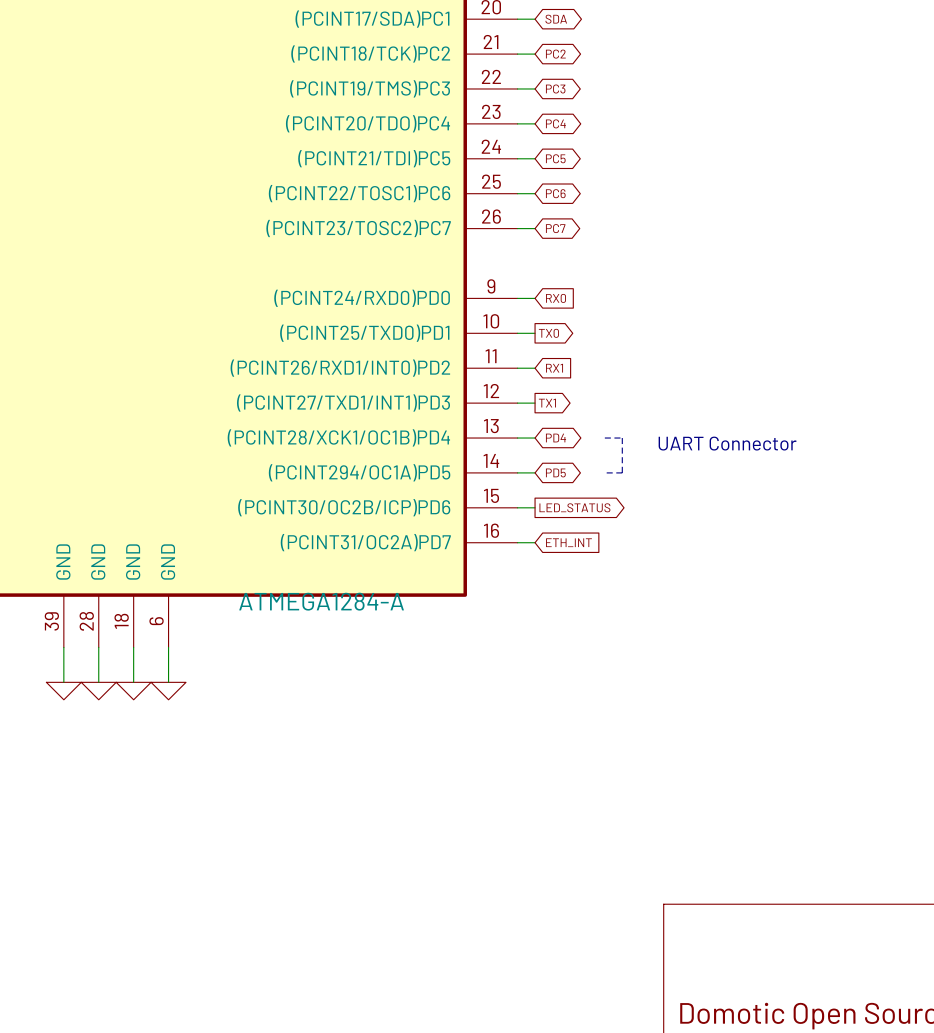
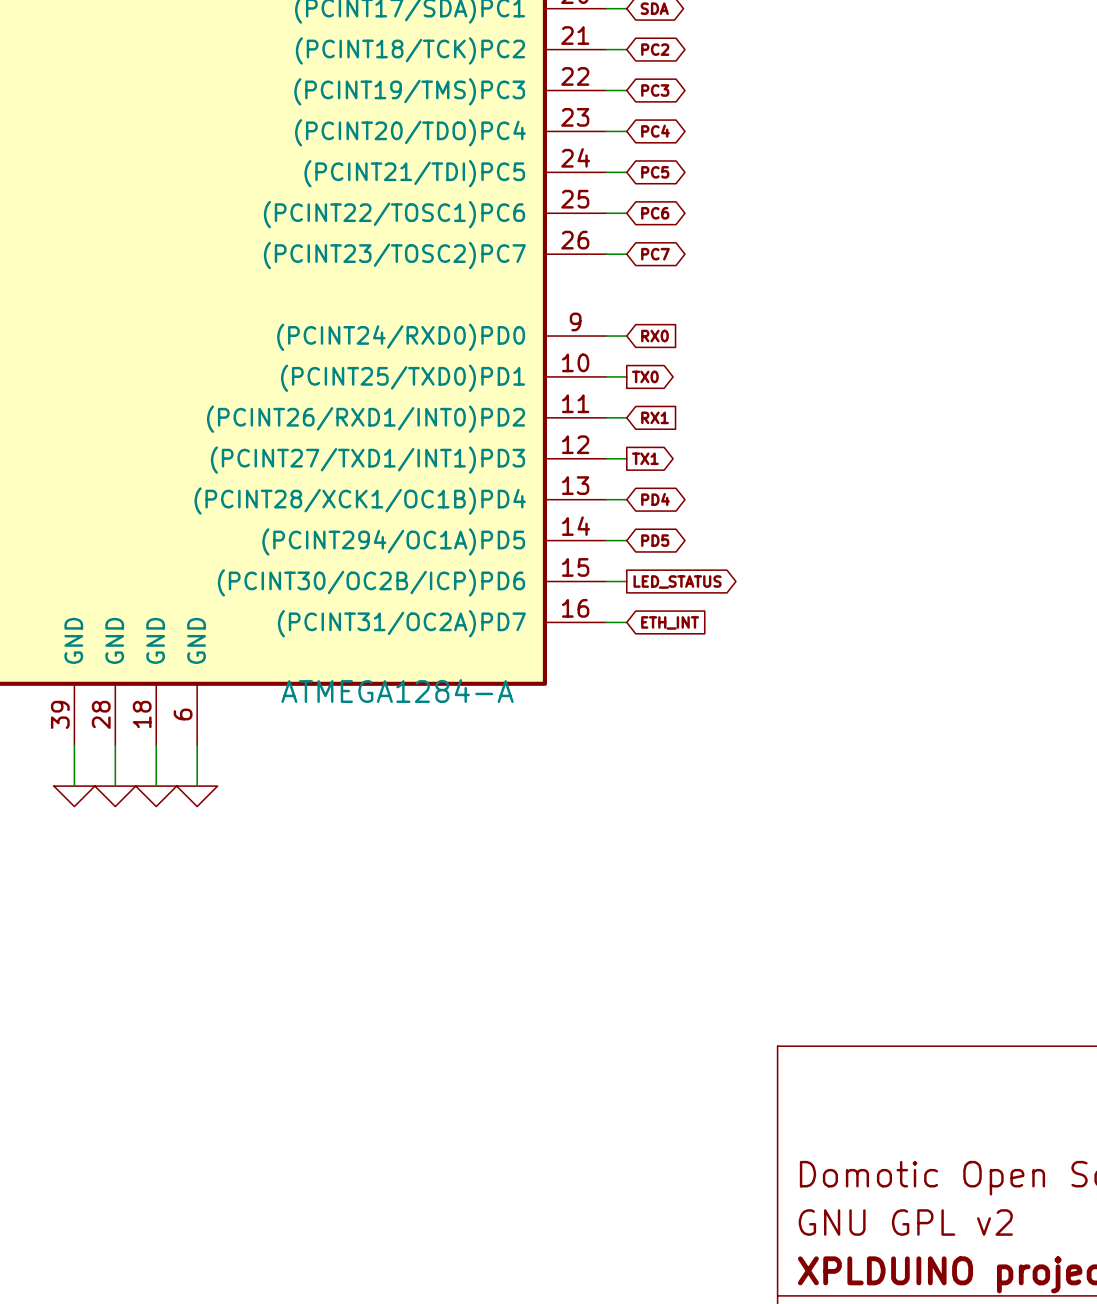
line: (604, 438) (622, 438) (622, 472) (604, 472) -> none
text: UART Connector (727, 443) -> none

